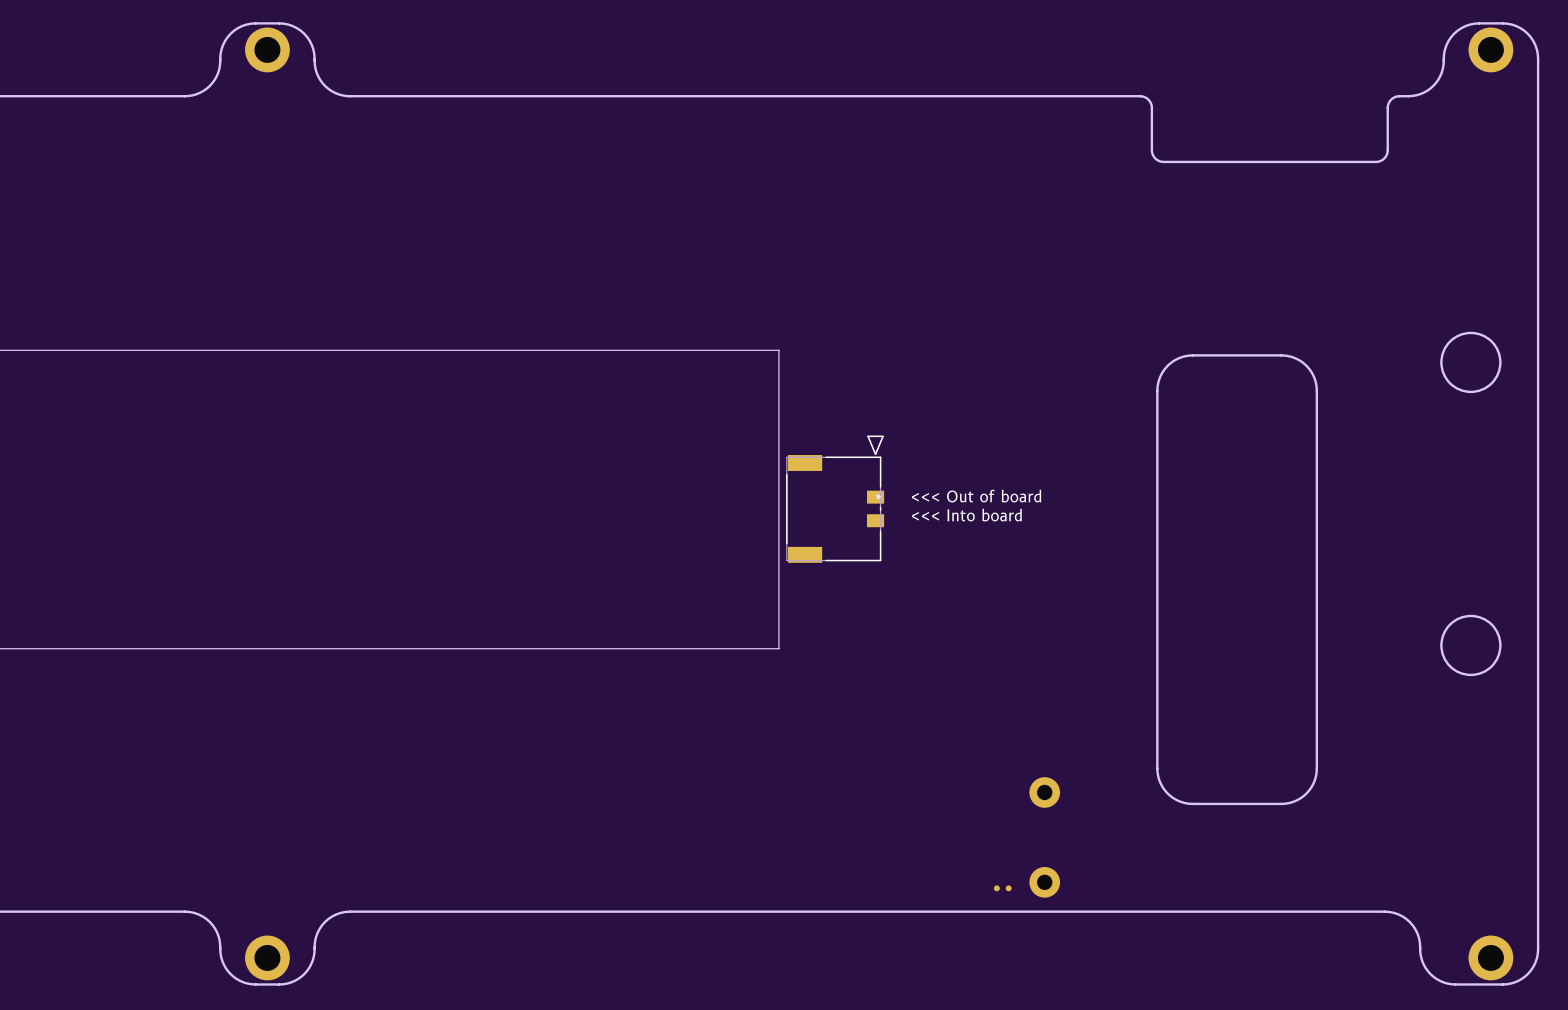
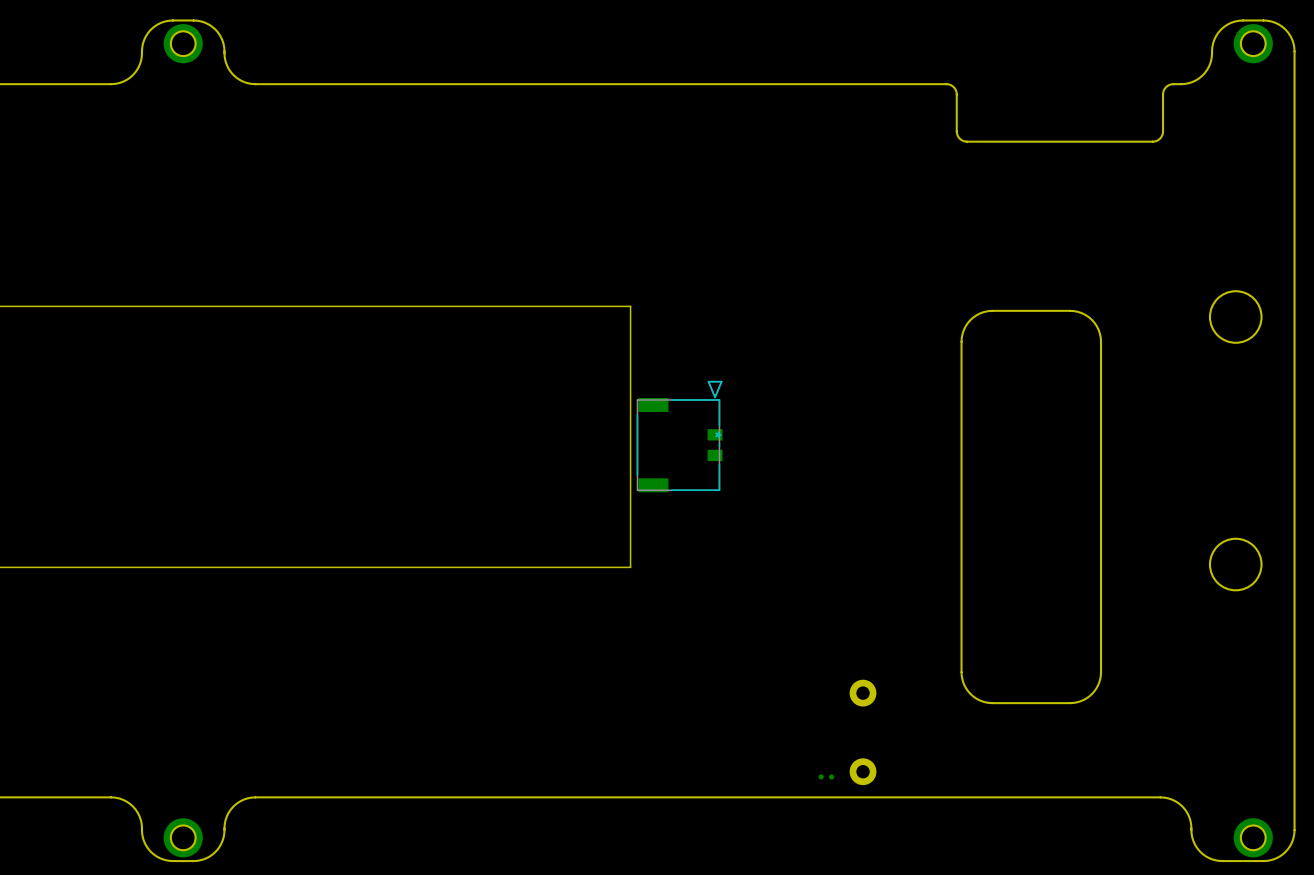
text: <<< Out of board (976, 496) -> none
text: <<< Into board (966, 515) -> none

